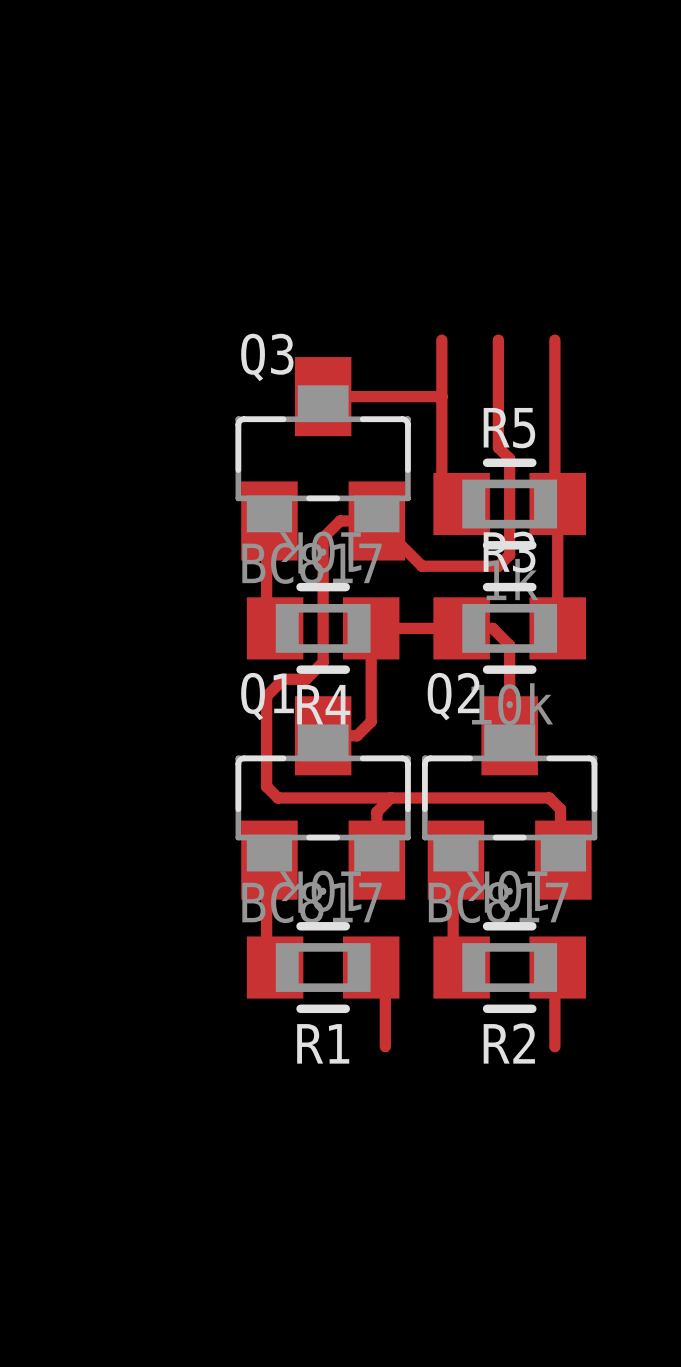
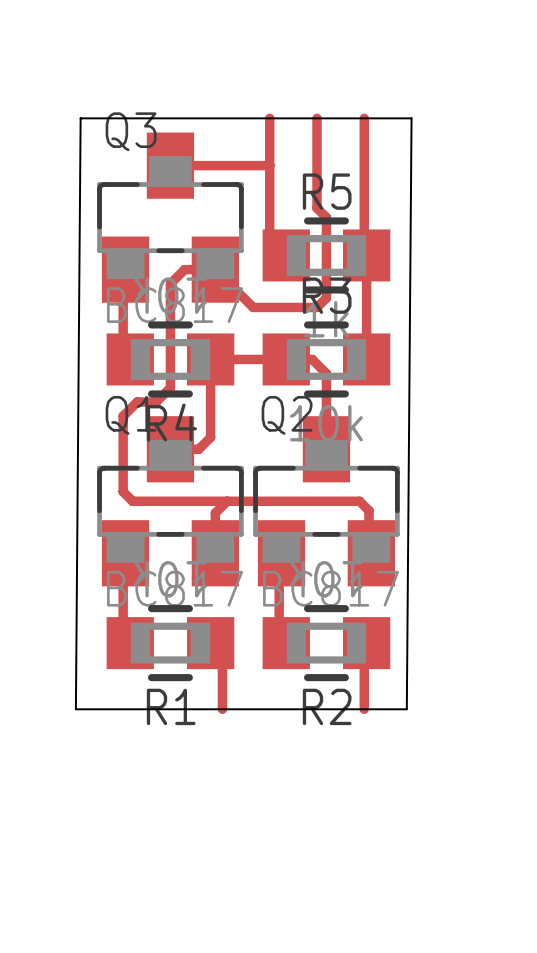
board edge: none -> (80, 118) (75, 709) (406, 709) (411, 118) (80, 118)

